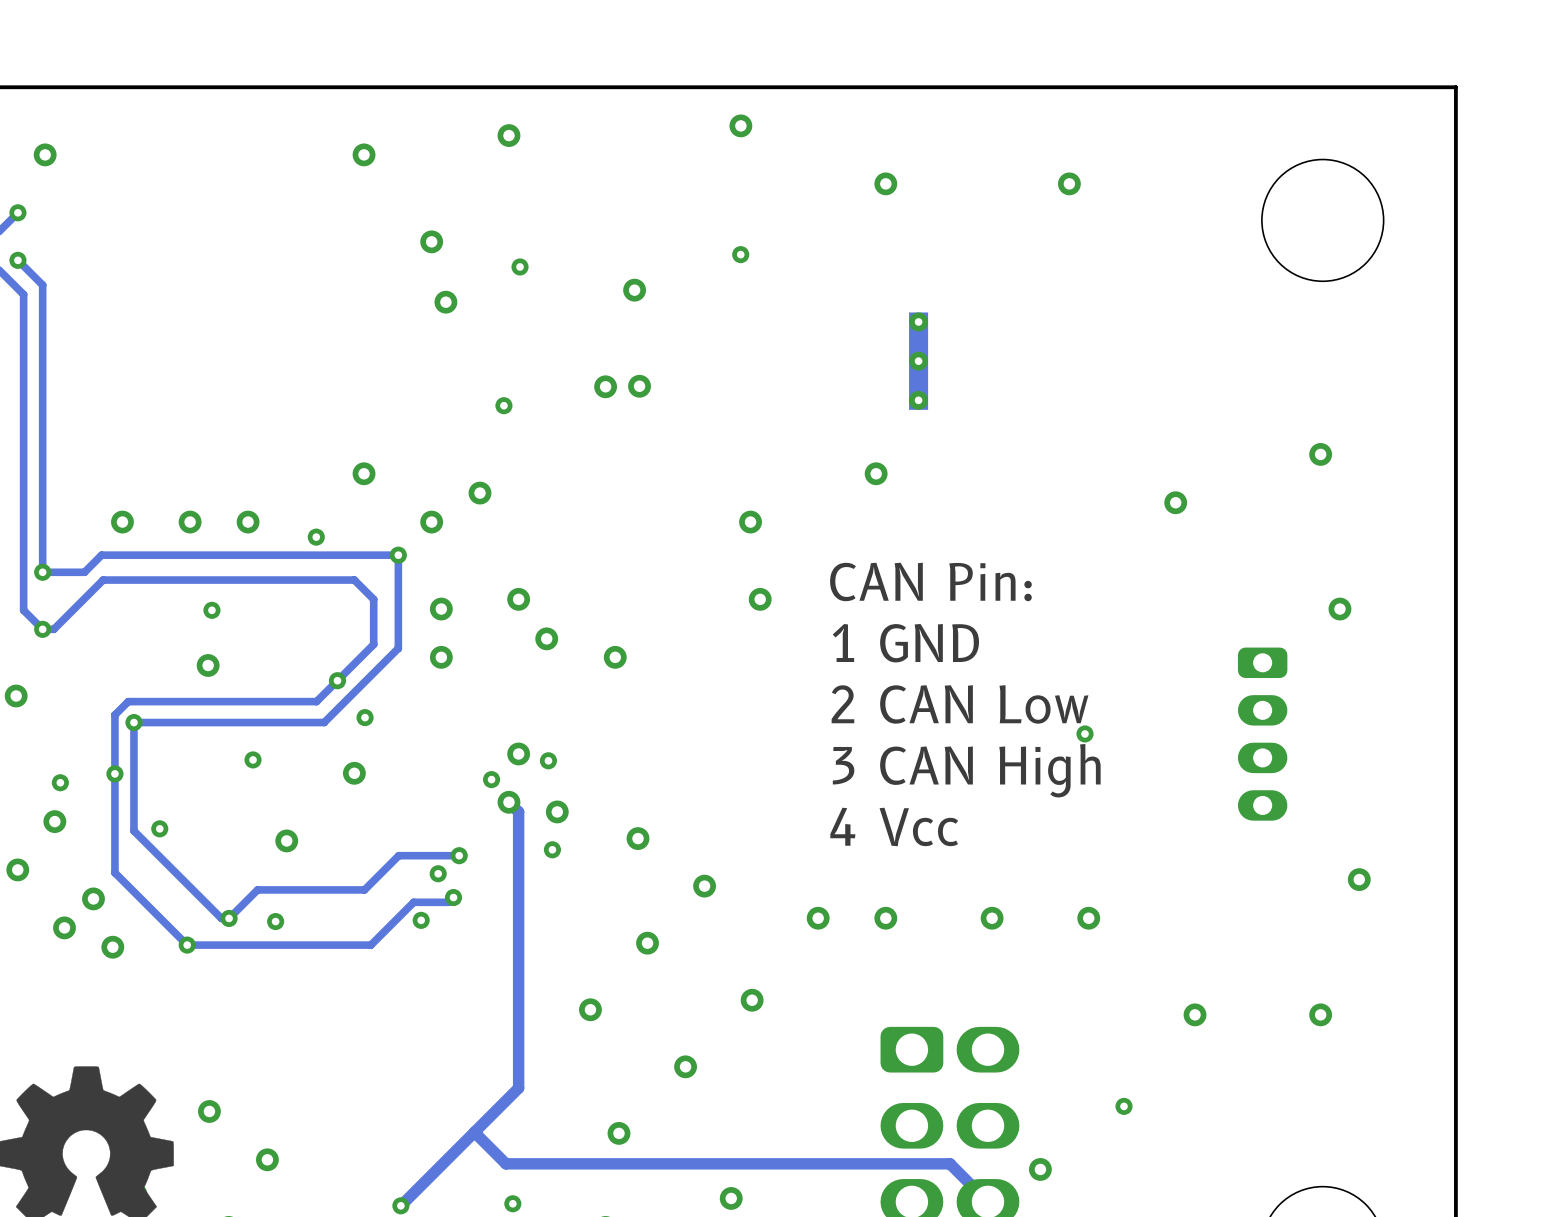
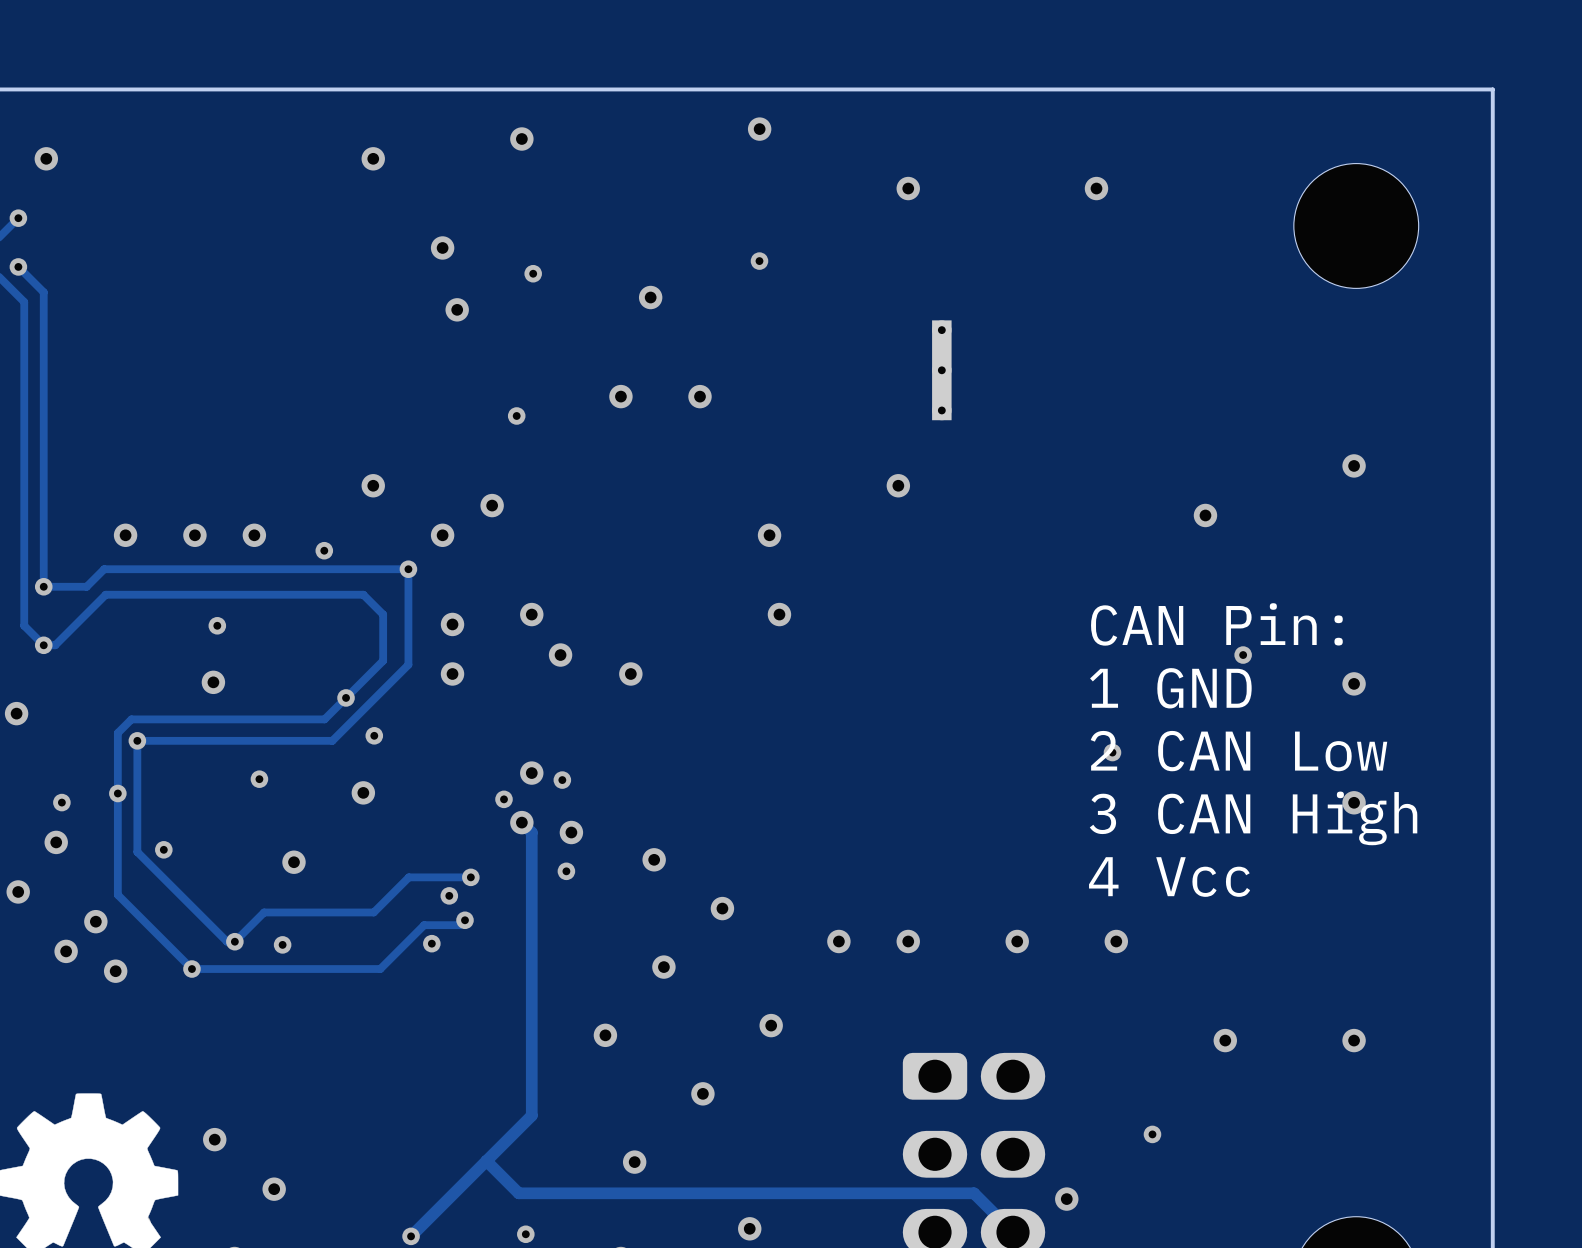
via position: (639, 386) -> (700, 396)
text position: CAN Pin: (930, 581) -> CAN Pin: (1216, 624)
via position: (1339, 609) -> (1354, 683)
via: none -> (1243, 655)
text position: 1 GND (905, 643) -> 1 GND (1170, 688)
text position: 2 CAN Low (960, 704) -> 2 CAN Low (1238, 751)
part: (1262, 734) -> none
text position: 3 CAN High (966, 770) -> 3 CAN High (1253, 818)
via: none -> (1354, 802)
text position: 4 Vcc (894, 826) -> 4 Vcc (1169, 877)
via: (1359, 879) -> none

